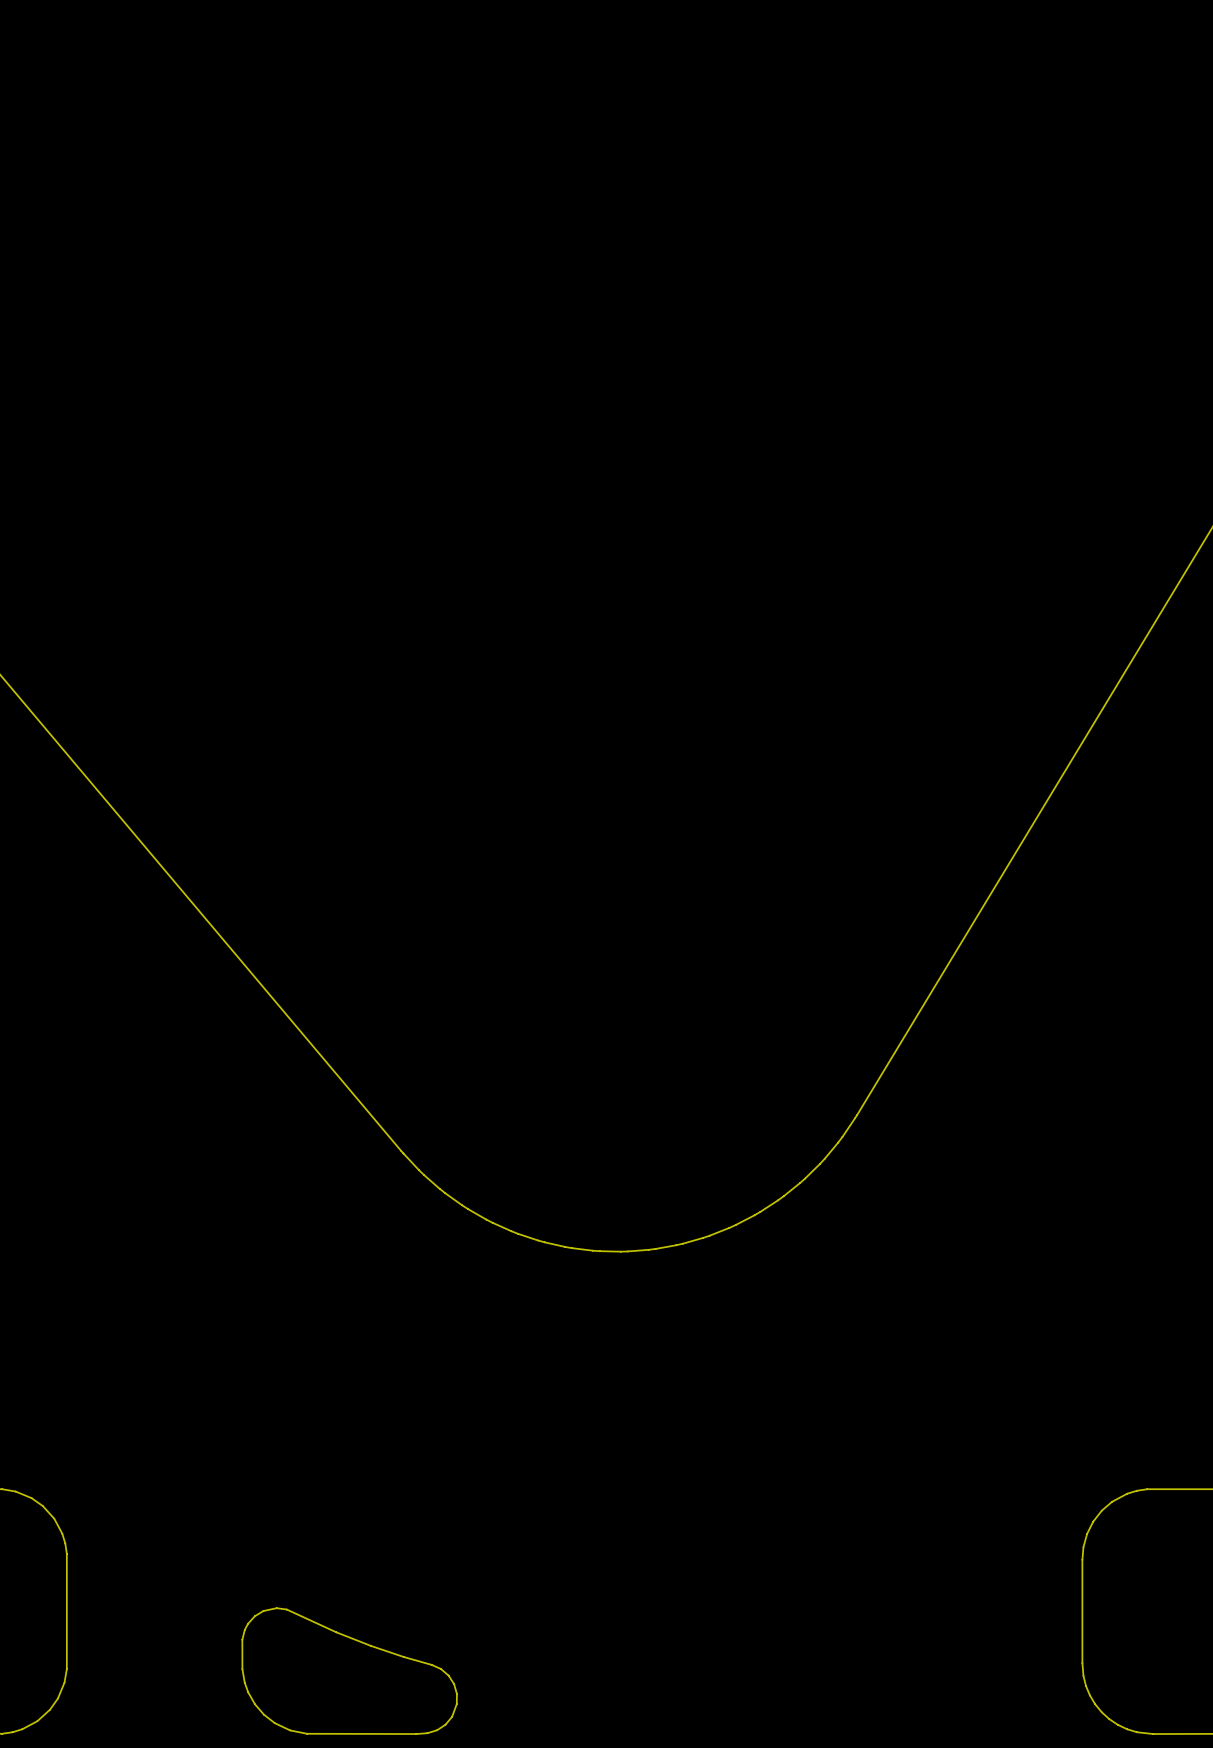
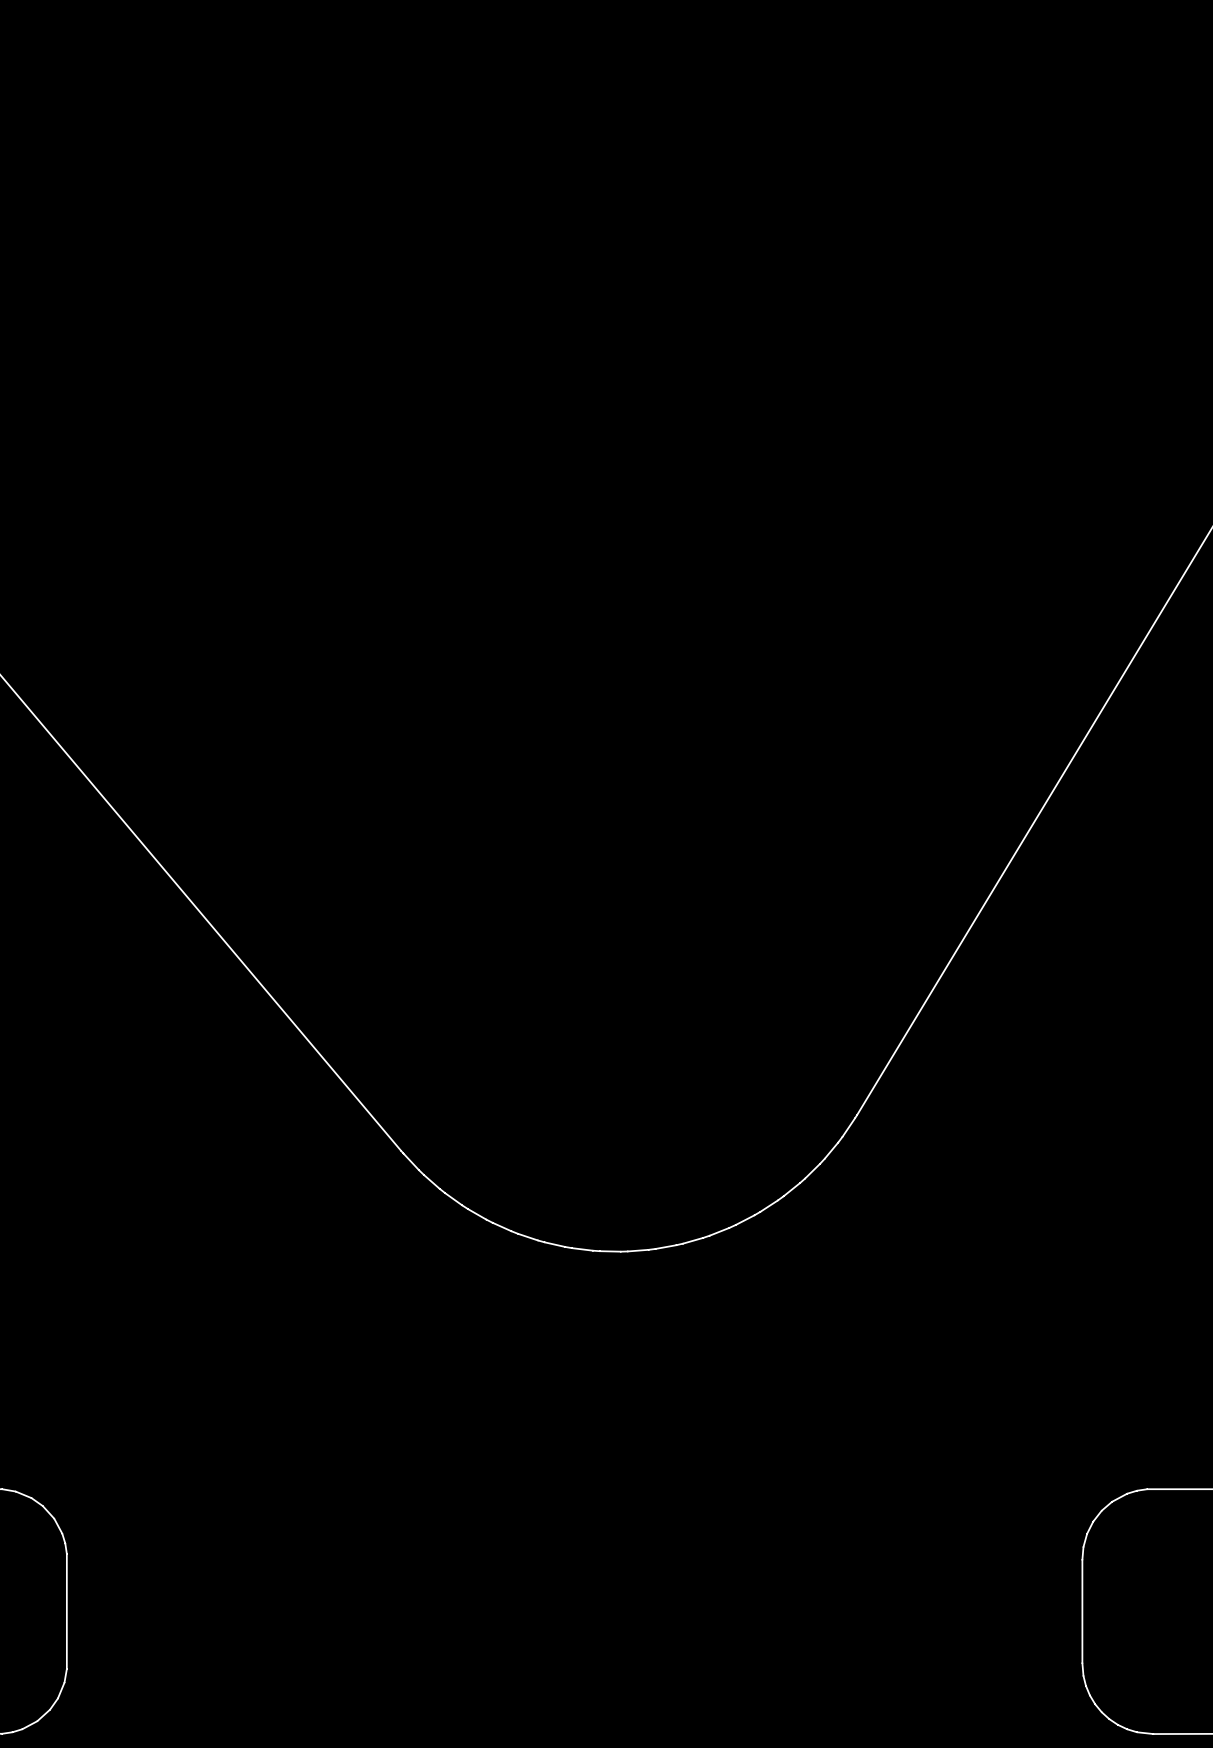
board edge: (276, 1608) (286, 1609) (371, 1645) (440, 1668) (448, 1675) (456, 1693) (456, 1704) (452, 1716) (437, 1730) (416, 1734) (307, 1733) (290, 1730) (274, 1723) (263, 1714) (248, 1692) (242, 1669) (242, 1639) (244, 1629) (254, 1616) (263, 1610) (276, 1608) -> none

